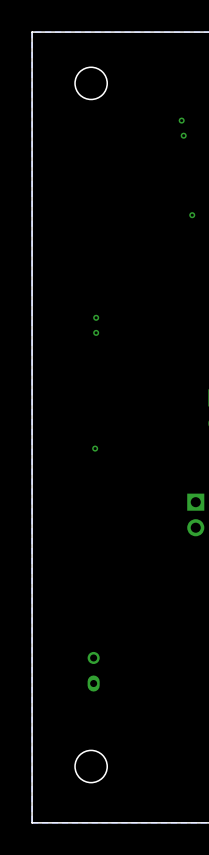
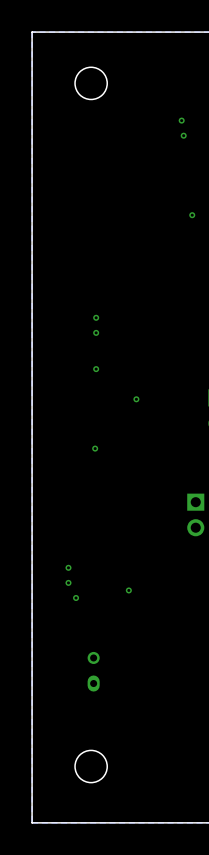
via: none -> (96, 369)
via: none -> (136, 399)
via: none -> (68, 567)
via: none -> (68, 582)
via: none -> (128, 590)
via: none -> (76, 598)

